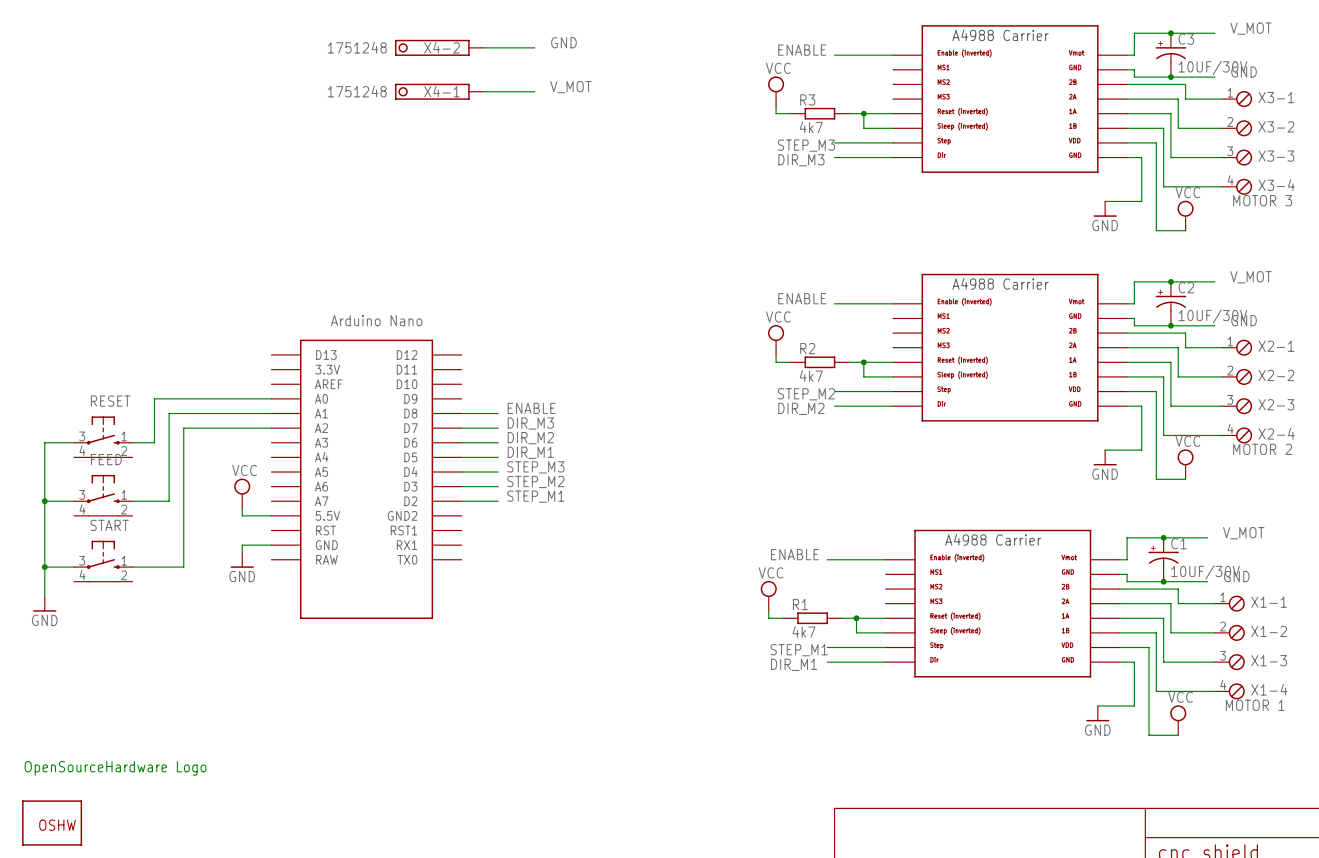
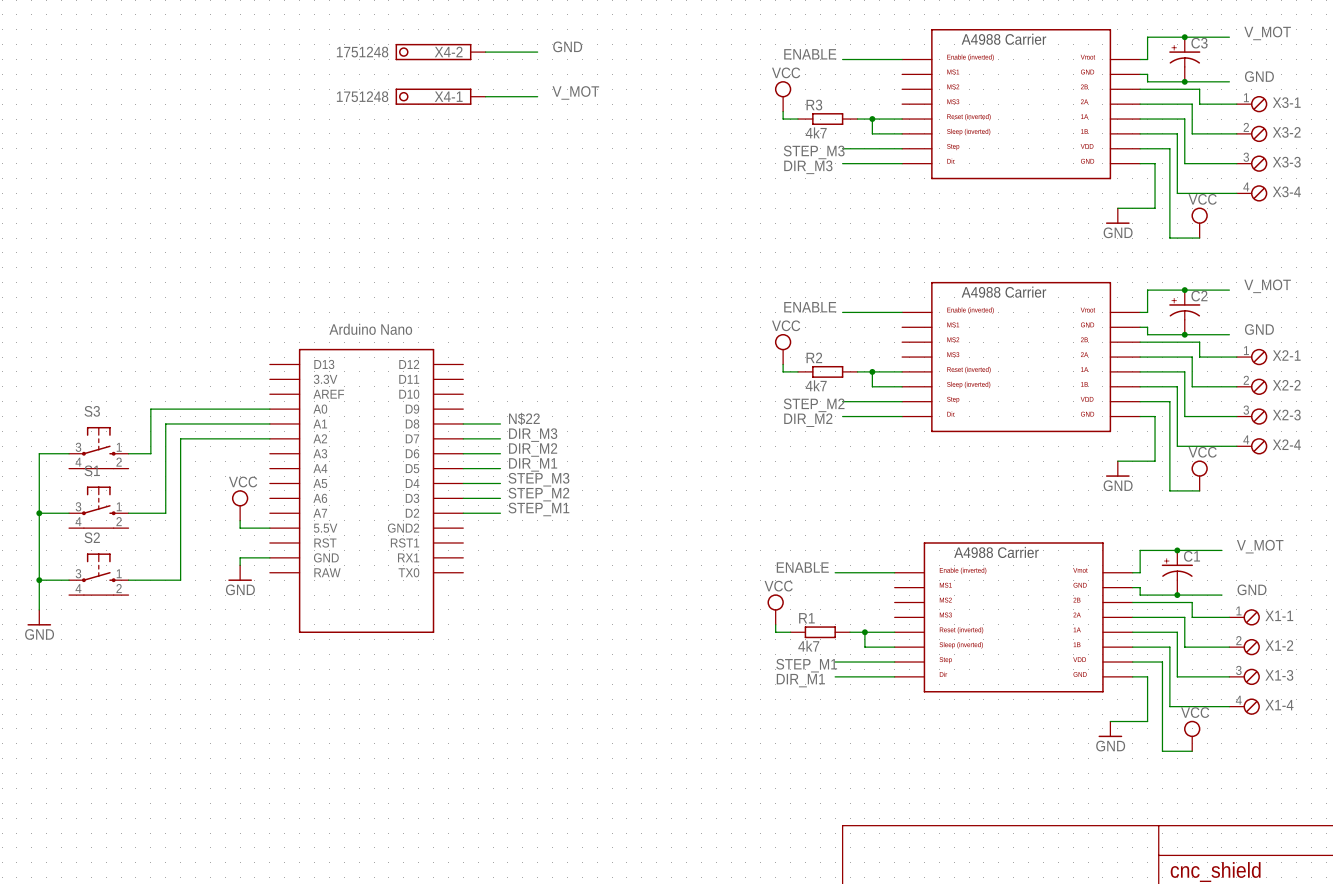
C3 value: 10UF/30V (1212, 67) -> none
X3-4 value: MOTOR 3 (1262, 200) -> none
C2 value: 10UF/30V (1212, 316) -> none
RESET name: RESET (110, 401) -> S3 (92, 411)
label: ENABLE (531, 408) -> N$22 (524, 418)
X2-4 value: MOTOR 2 (1262, 449) -> none
FEED name: FEED (106, 459) -> S1 (92, 470)
START name: START (109, 525) -> S2 (92, 537)
C1 value: 10UF/30V (1205, 572) -> none
X1-4 value: MOTOR 1 (1255, 705) -> none
text: OpenSourceHardware Logo (115, 768) -> none
part: (52, 823) -> none

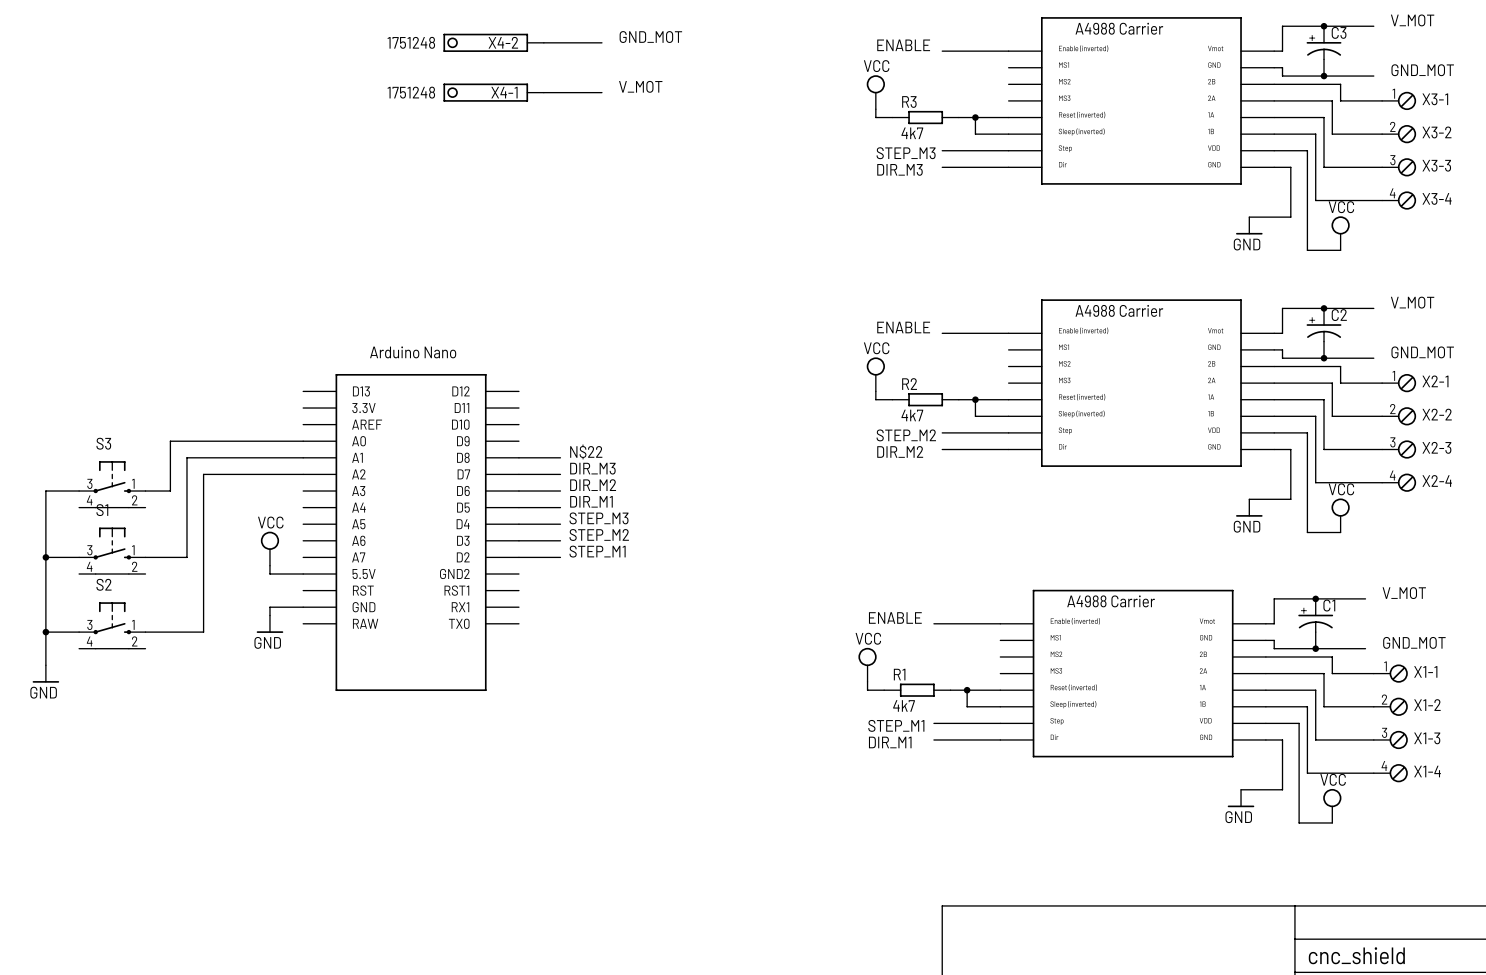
label: GND (567, 46) -> GND_MOT (650, 37)
label: GND (1259, 76) -> GND_MOT (1422, 70)
label: GND (1259, 329) -> GND_MOT (1422, 352)
label: GND (1251, 589) -> GND_MOT (1414, 642)

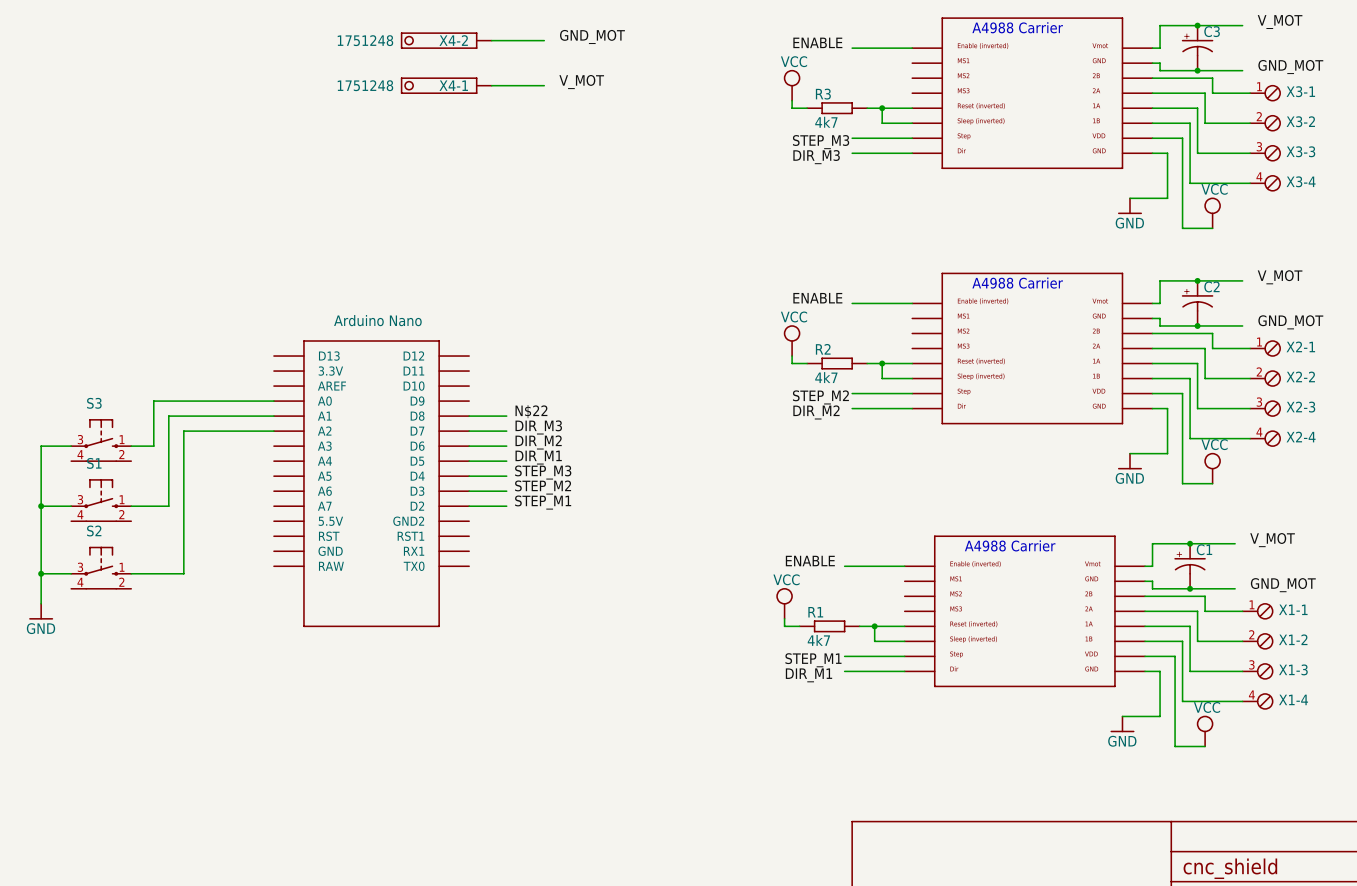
power symbol: VCC (269, 548) -> none
wire: (269, 565) (269, 574) (303, 574) -> none
wire: (303, 607) (269, 607) (269, 615) -> none
power symbol: GND (269, 624) -> none

